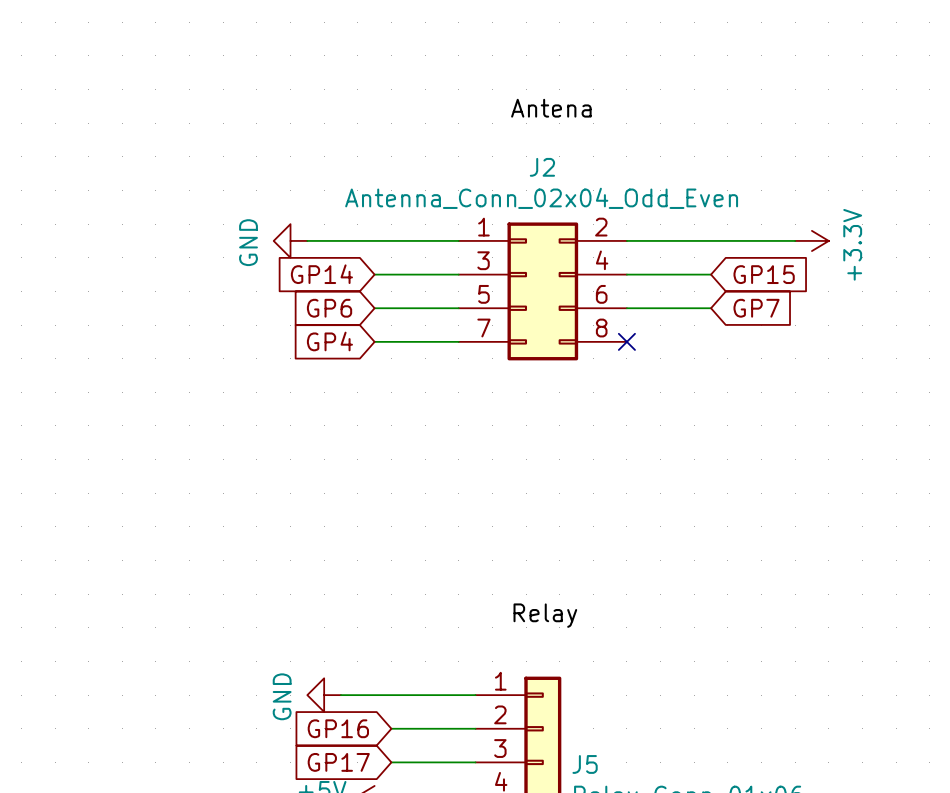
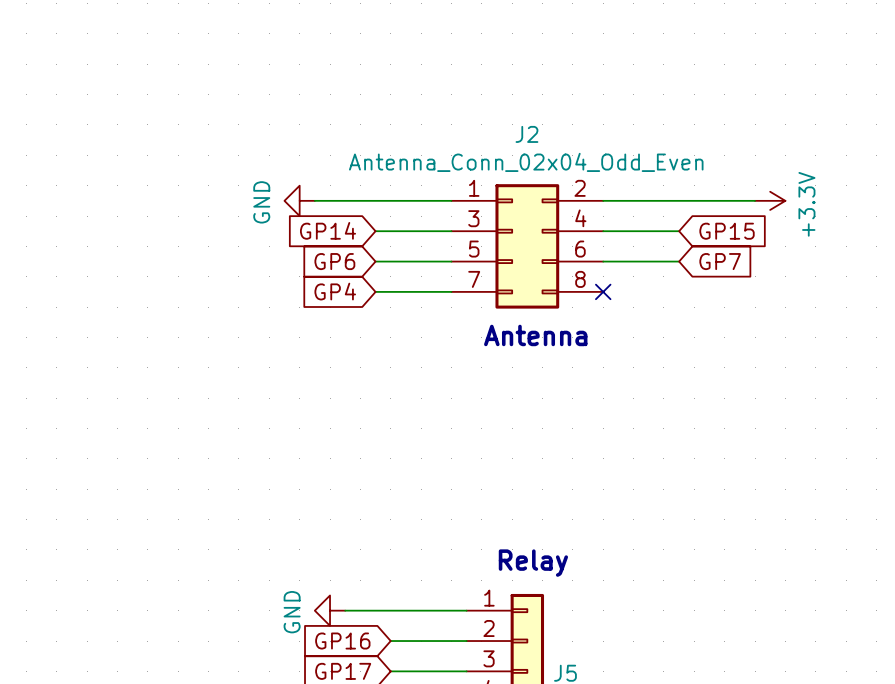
label: Antena (551, 108) -> none
text: none -> Antenna (535, 335)
label: Relay (545, 615) -> none
text: none -> Relay (533, 563)

